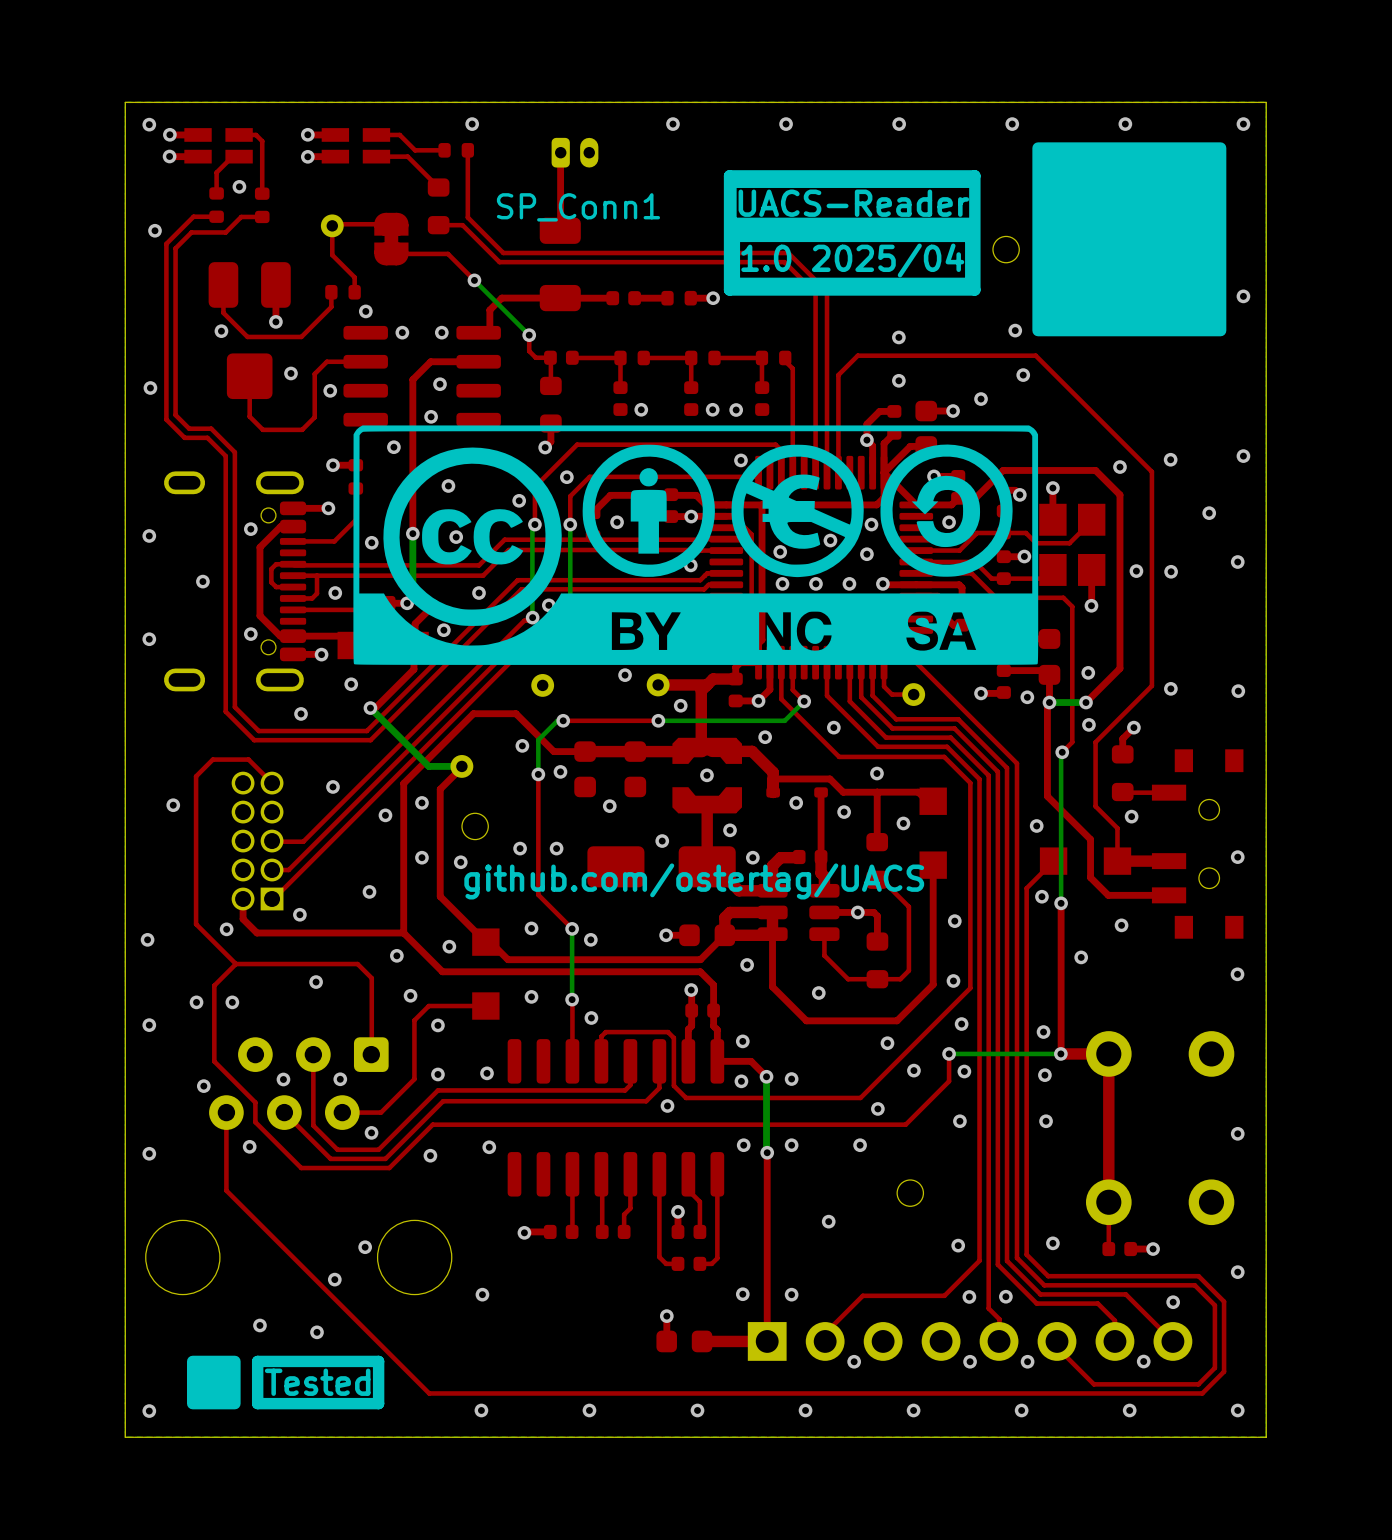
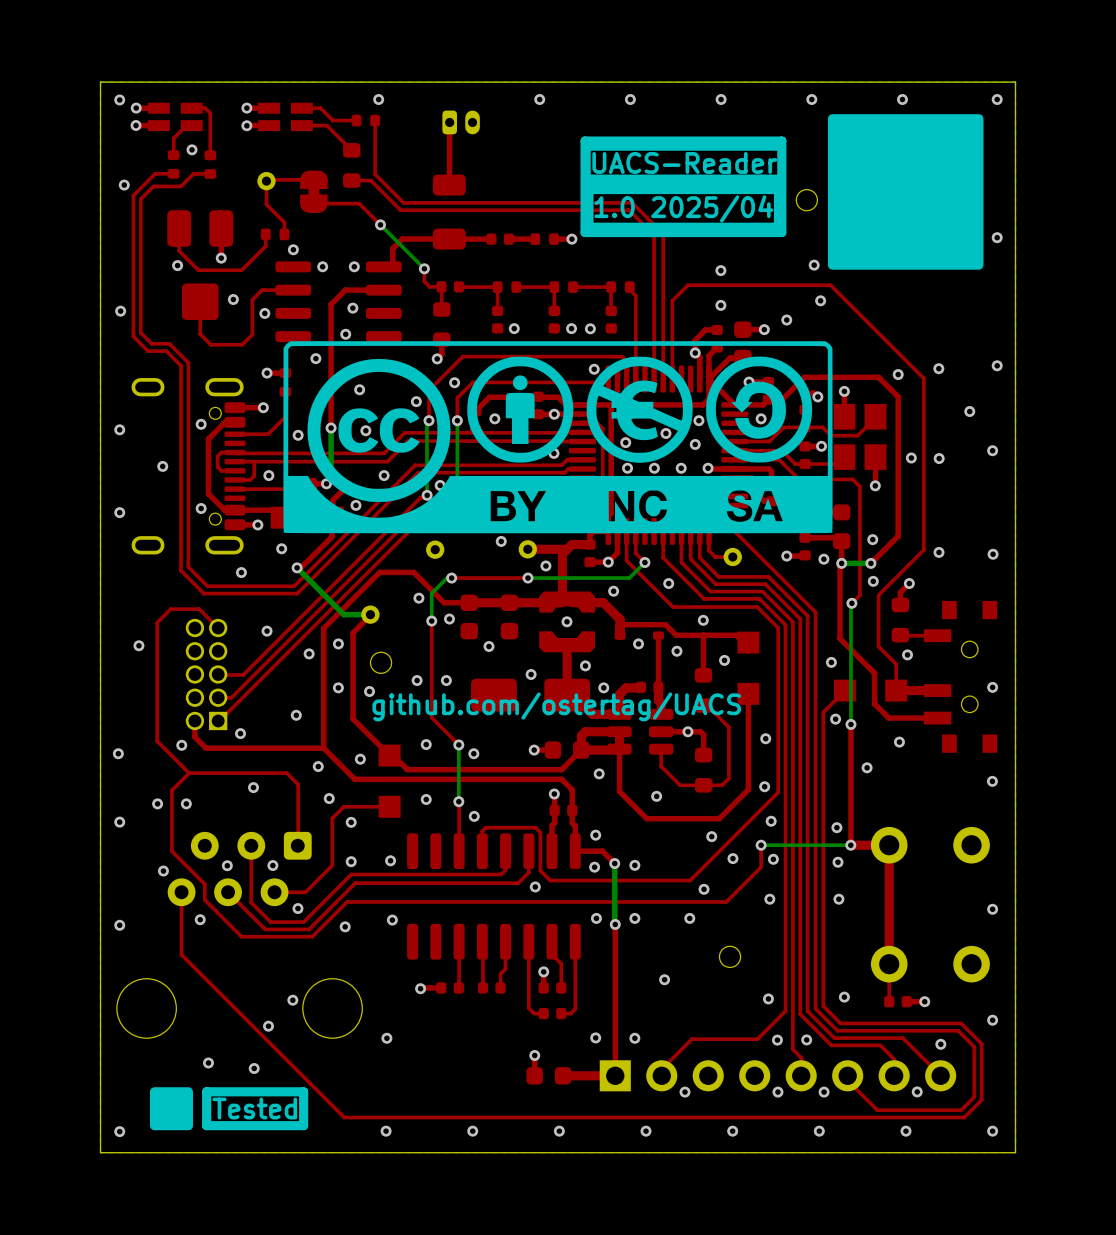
SP_Conn1 name: SP_Conn1 (578, 207) -> none

